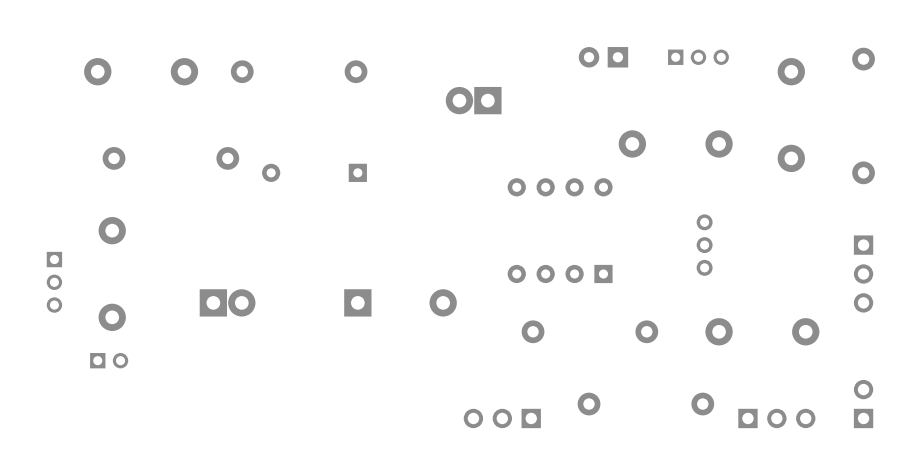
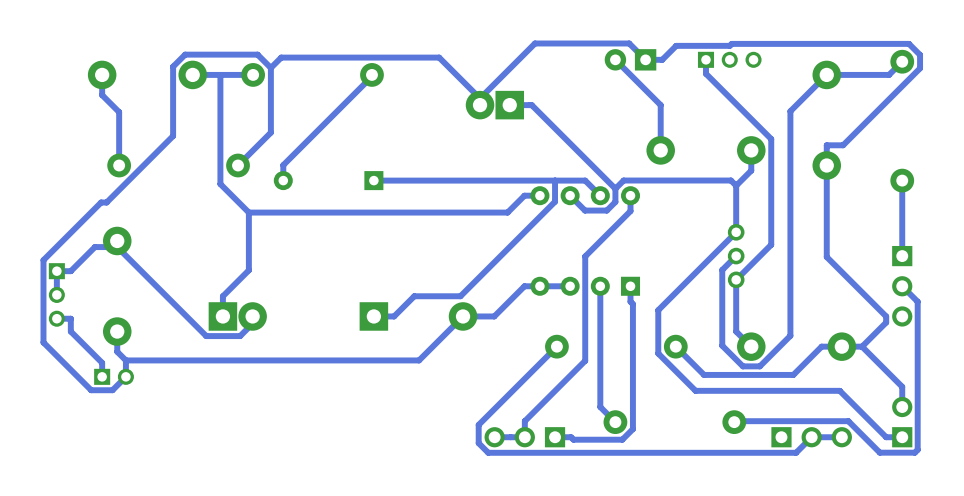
track: none -> (615, 59) (660, 105) (660, 150)
track: none -> (705, 59) (705, 73) (771, 139) (771, 244) (736, 279) (736, 331) (751, 346)
track: none -> (902, 61) (889, 74) (826, 74) (790, 111) (790, 335) (759, 366) (742, 366) (722, 345) (722, 270) (736, 256)
track: none -> (270, 67) (281, 57) (439, 57) (480, 98)
track: none -> (270, 67) (270, 132) (238, 165)
track: none -> (270, 67) (257, 54) (185, 54) (173, 66) (173, 136) (106, 202) (101, 202) (43, 260) (43, 342) (91, 390) (112, 390) (125, 376) (125, 360)
track: none -> (102, 74) (102, 95) (119, 112) (119, 165)
track: none -> (220, 74) (220, 184) (248, 212)
track: none -> (253, 74) (192, 74)
track: none -> (371, 74) (283, 165) (283, 180)
track: none -> (480, 98) (534, 43) (629, 43) (645, 59) (662, 59) (676, 45) (909, 43) (920, 54) (920, 68) (843, 145) (826, 145) (826, 257) (886, 316) (886, 322) (862, 346)
track: none -> (509, 105) (531, 105) (615, 188)
track: none -> (751, 150) (751, 170) (736, 185)
track: none -> (373, 180) (585, 180) (600, 195)
track: none -> (555, 180) (555, 201) (460, 296) (414, 296) (394, 316) (373, 316)
track: none -> (902, 180) (902, 256)
track: none -> (736, 185) (730, 180) (623, 180) (615, 188)
track: none -> (736, 185) (736, 232) (658, 310) (658, 353) (695, 390) (839, 390) (886, 437) (902, 437)
track: none -> (615, 188) (615, 201) (606, 210) (584, 210) (570, 195)
track: none -> (539, 195) (524, 195) (507, 212) (248, 212)
track: none -> (630, 195) (630, 211) (585, 256) (585, 360) (524, 421) (524, 437) (494, 437)
track: none -> (248, 212) (248, 270) (222, 296) (222, 316)
track: none -> (117, 247) (94, 247) (70, 271) (56, 271) (56, 294)
track: none -> (117, 247) (206, 336) (240, 336) (252, 323) (252, 316)
track: none -> (570, 286) (524, 286) (494, 316) (463, 316) (419, 360) (125, 360)
track: none -> (600, 286) (600, 407) (615, 422)
track: none -> (630, 286) (630, 301) (632, 304) (632, 429) (622, 439) (573, 439) (571, 437) (555, 437)
track: none -> (902, 286) (917, 301) (917, 449) (914, 452) (879, 452) (848, 421) (734, 422)
track: none -> (56, 318) (70, 318) (70, 331) (102, 362) (102, 376)
track: none -> (117, 331) (117, 351) (125, 360)
track: none -> (556, 346) (478, 424) (478, 443) (488, 452) (796, 452) (811, 437) (841, 437)
track: none -> (862, 346) (821, 346) (793, 374) (704, 374) (675, 346)
track: none -> (862, 346) (902, 386) (902, 407)

